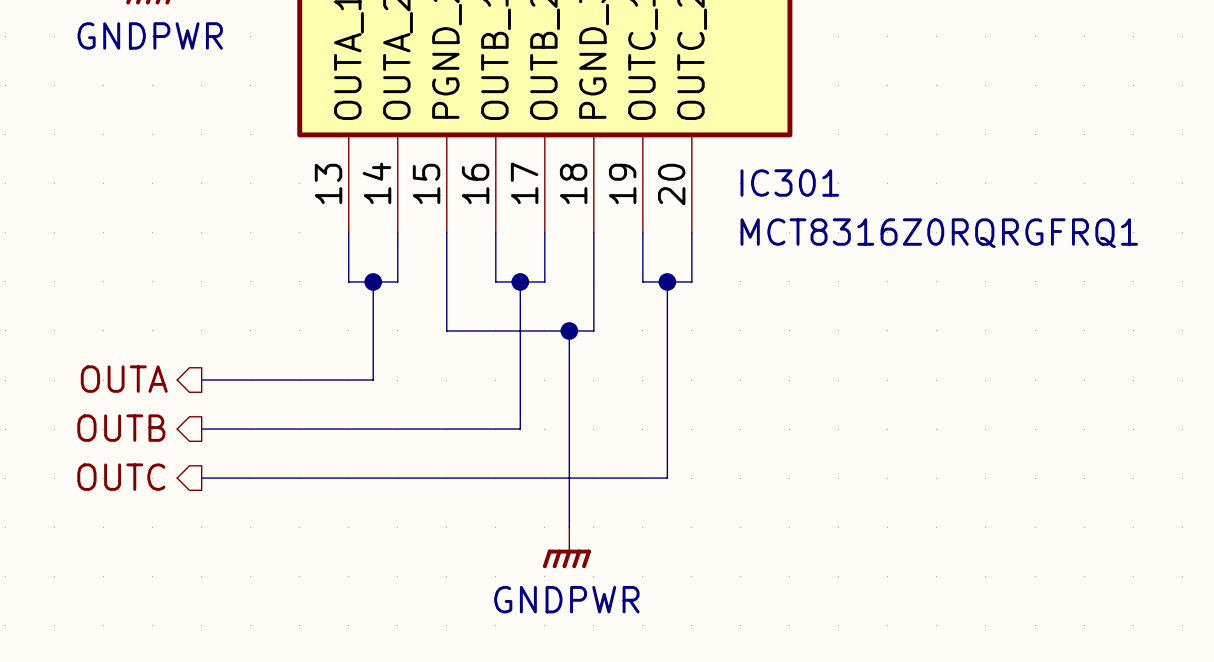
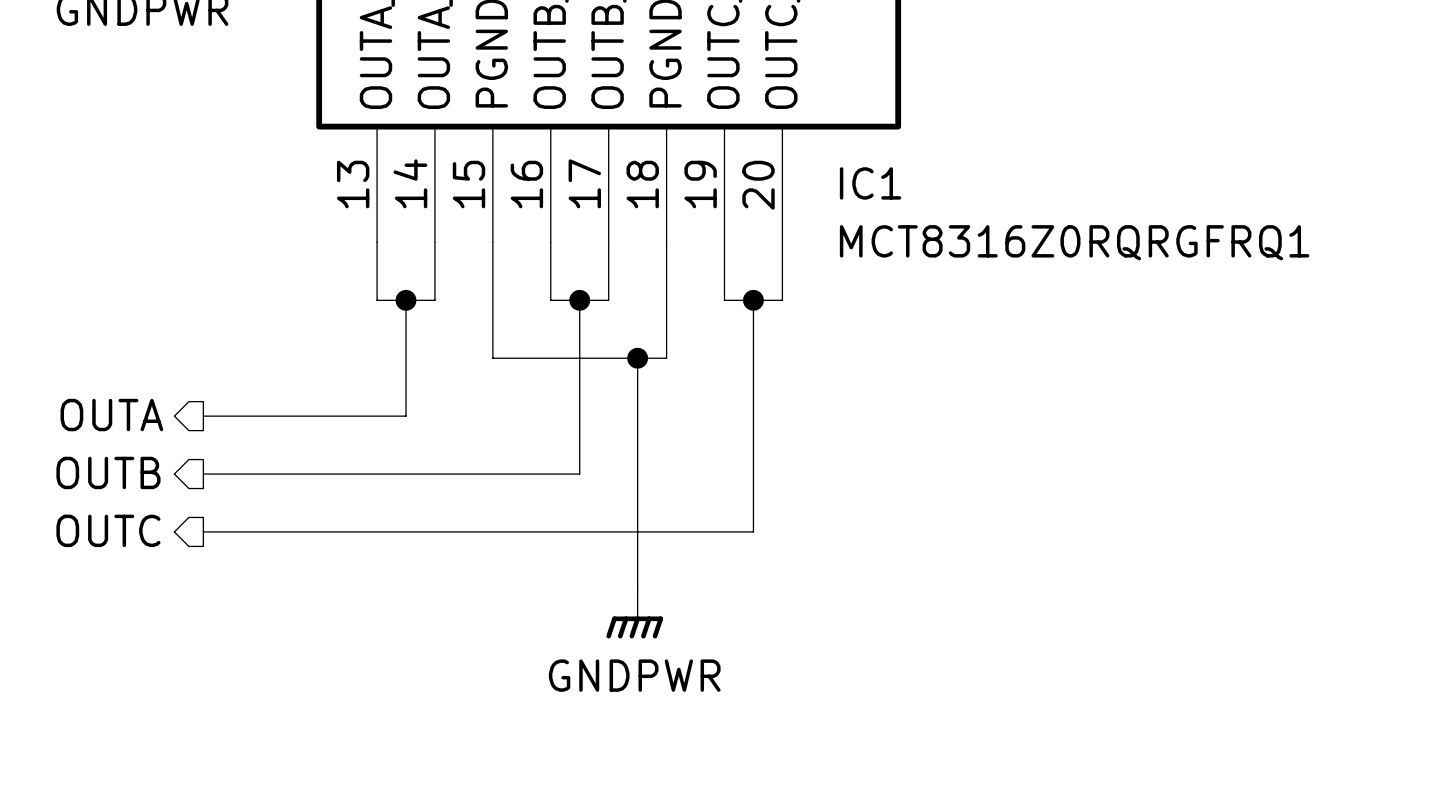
IC301 name: IC301 (789, 183) -> IC1 (870, 183)

